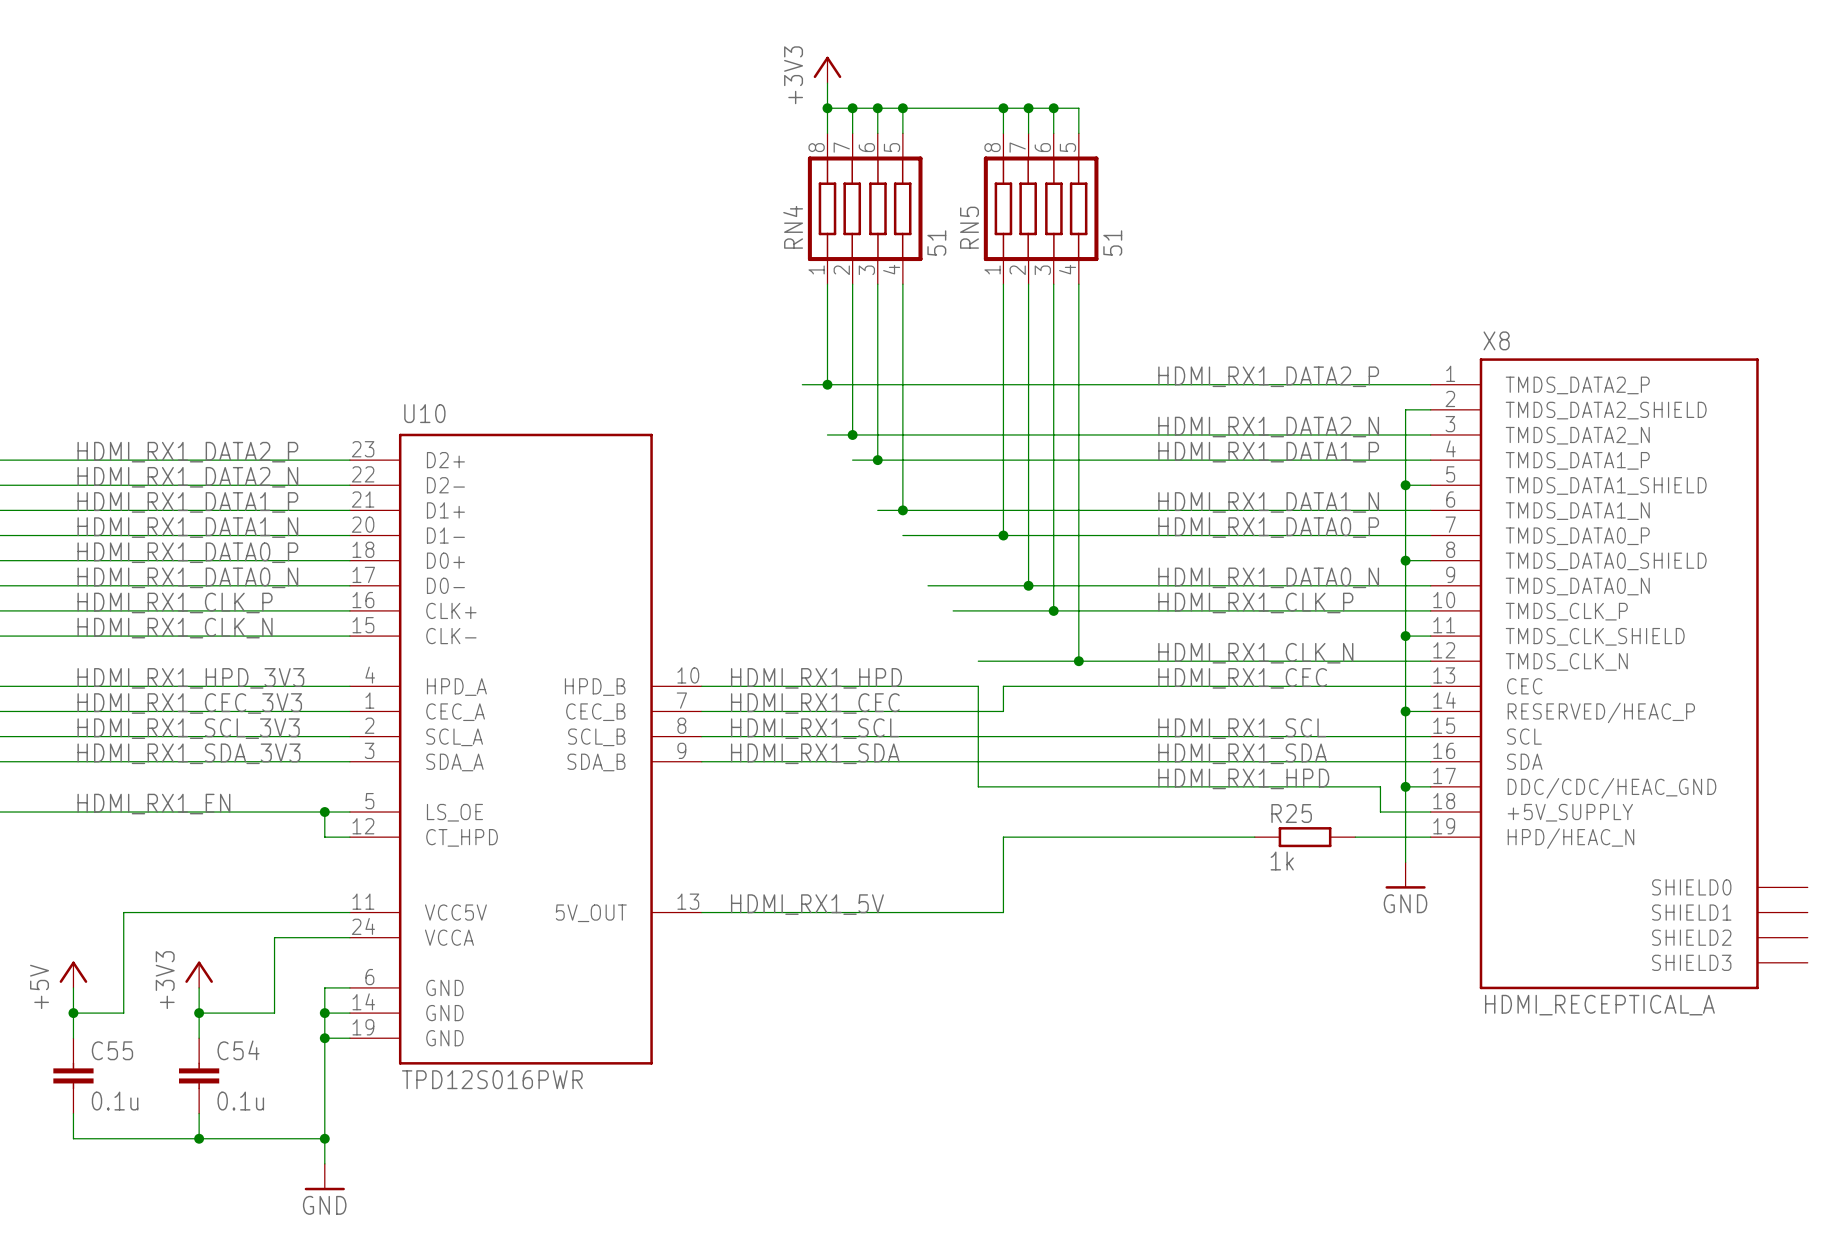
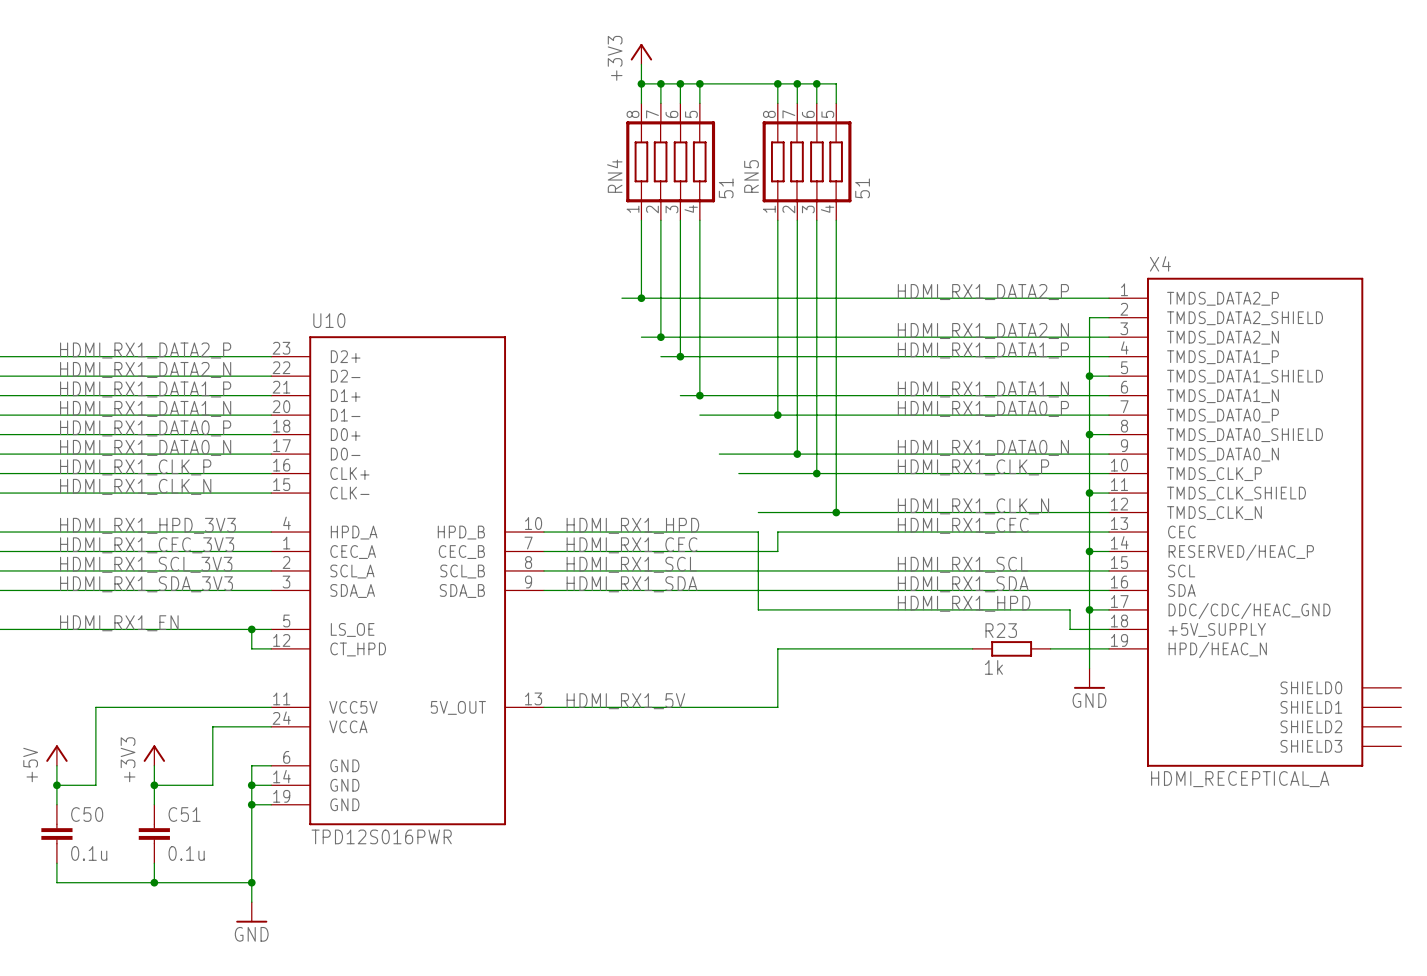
X8 name: X8 (1496, 340) -> X4 (1160, 263)
R25 name: R25 (1291, 813) -> R23 (1001, 630)
C55 name: C55 (112, 1050) -> C50 (87, 814)
C54 name: C54 (238, 1050) -> C51 (184, 814)

